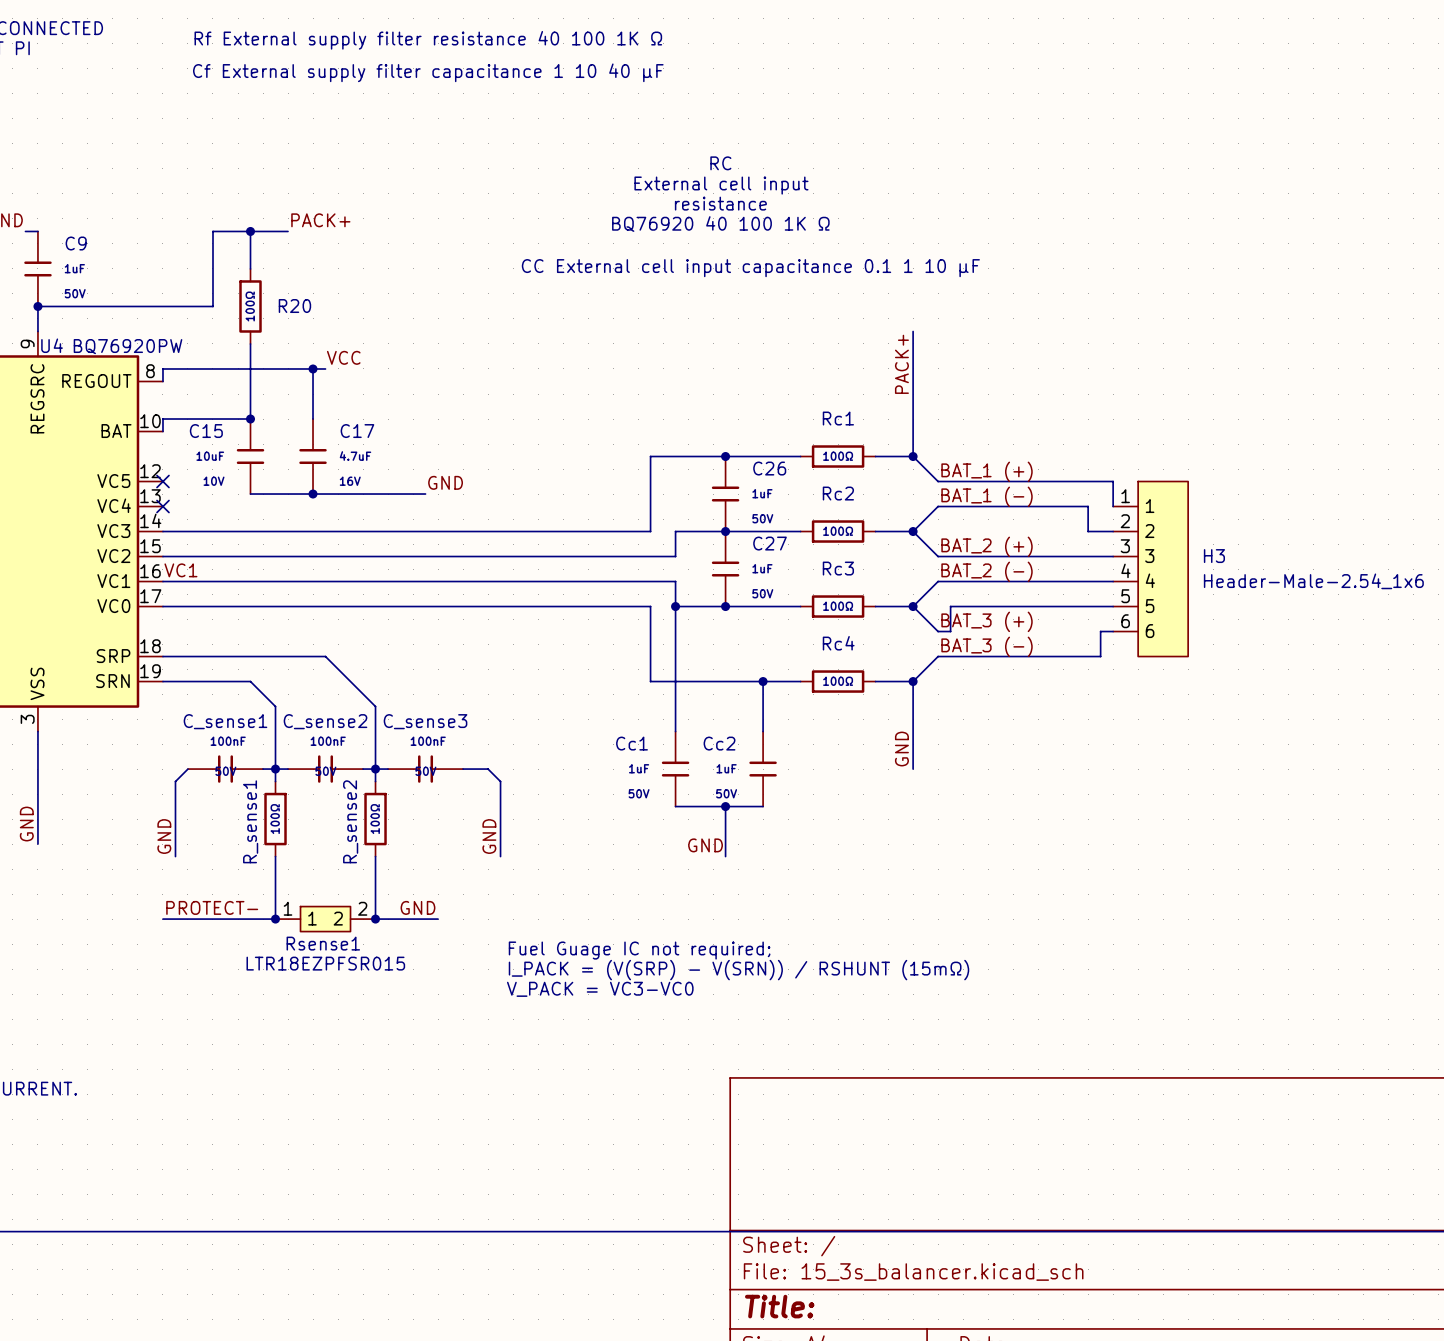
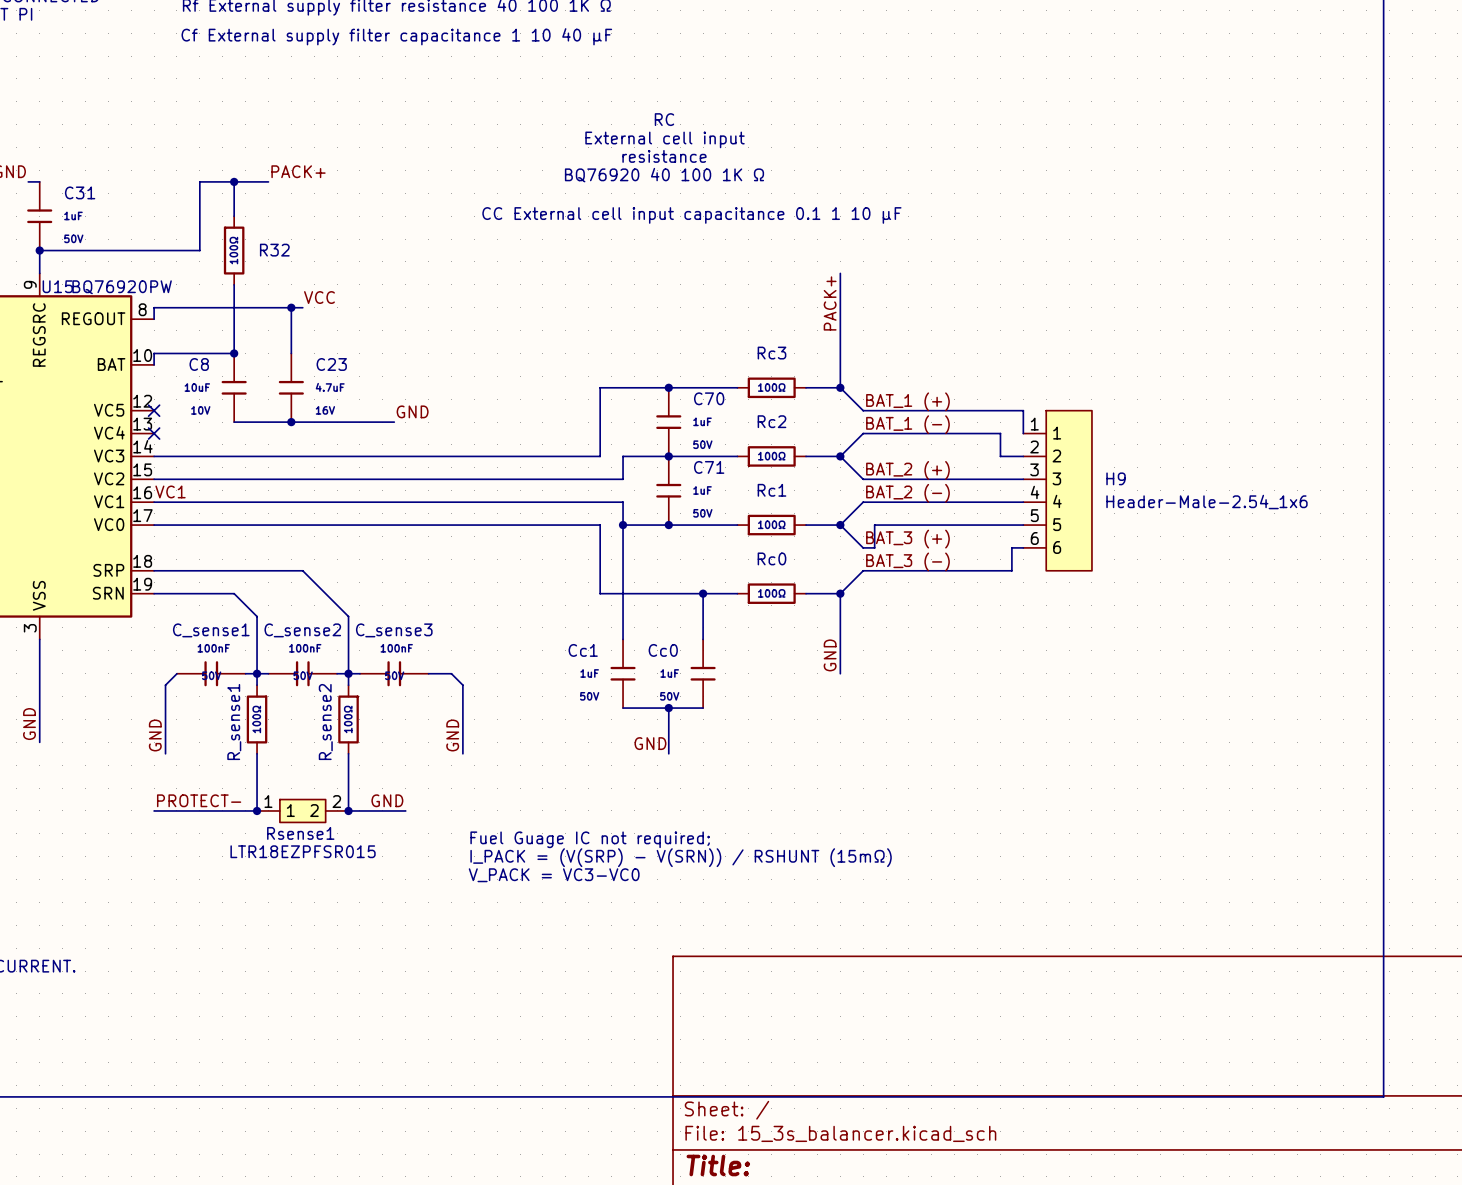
C9 name: C9 (76, 243) -> C31 (80, 192)
R20 name: R20 (294, 306) -> R32 (274, 250)
U4 name: U4 (52, 345) -> U15 (57, 286)
Rc1 name: Rc1 (838, 418) -> Rc3 (771, 353)
C15 name: C15 (206, 431) -> C8 (199, 364)
C17 name: C17 (357, 431) -> C23 (331, 364)
C26 name: C26 (769, 468) -> C70 (709, 398)
C27 name: C27 (770, 543) -> C71 (709, 467)
H3 name: H3 (1214, 556) -> H9 (1116, 478)
Rc3 name: Rc3 (838, 568) -> Rc1 (771, 490)
Rc4 name: Rc4 (838, 643) -> Rc0 (771, 558)
Cc2 name: Cc2 (719, 743) -> Cc0 (663, 650)

